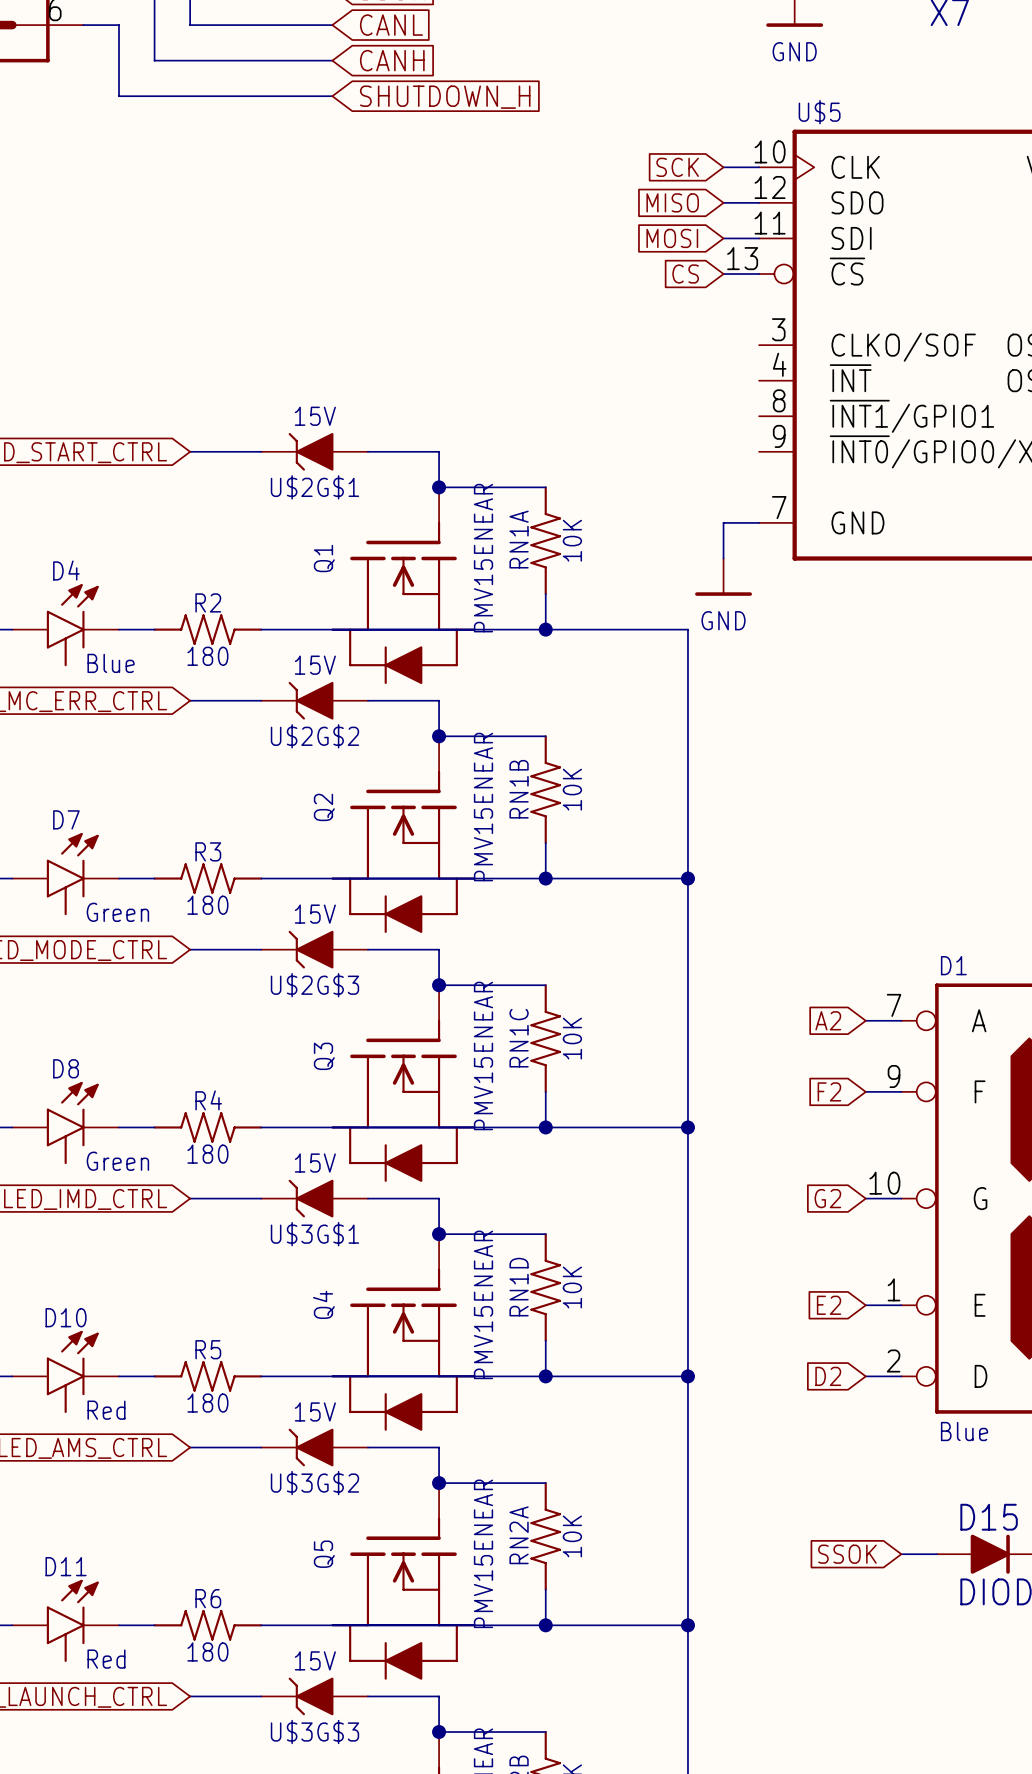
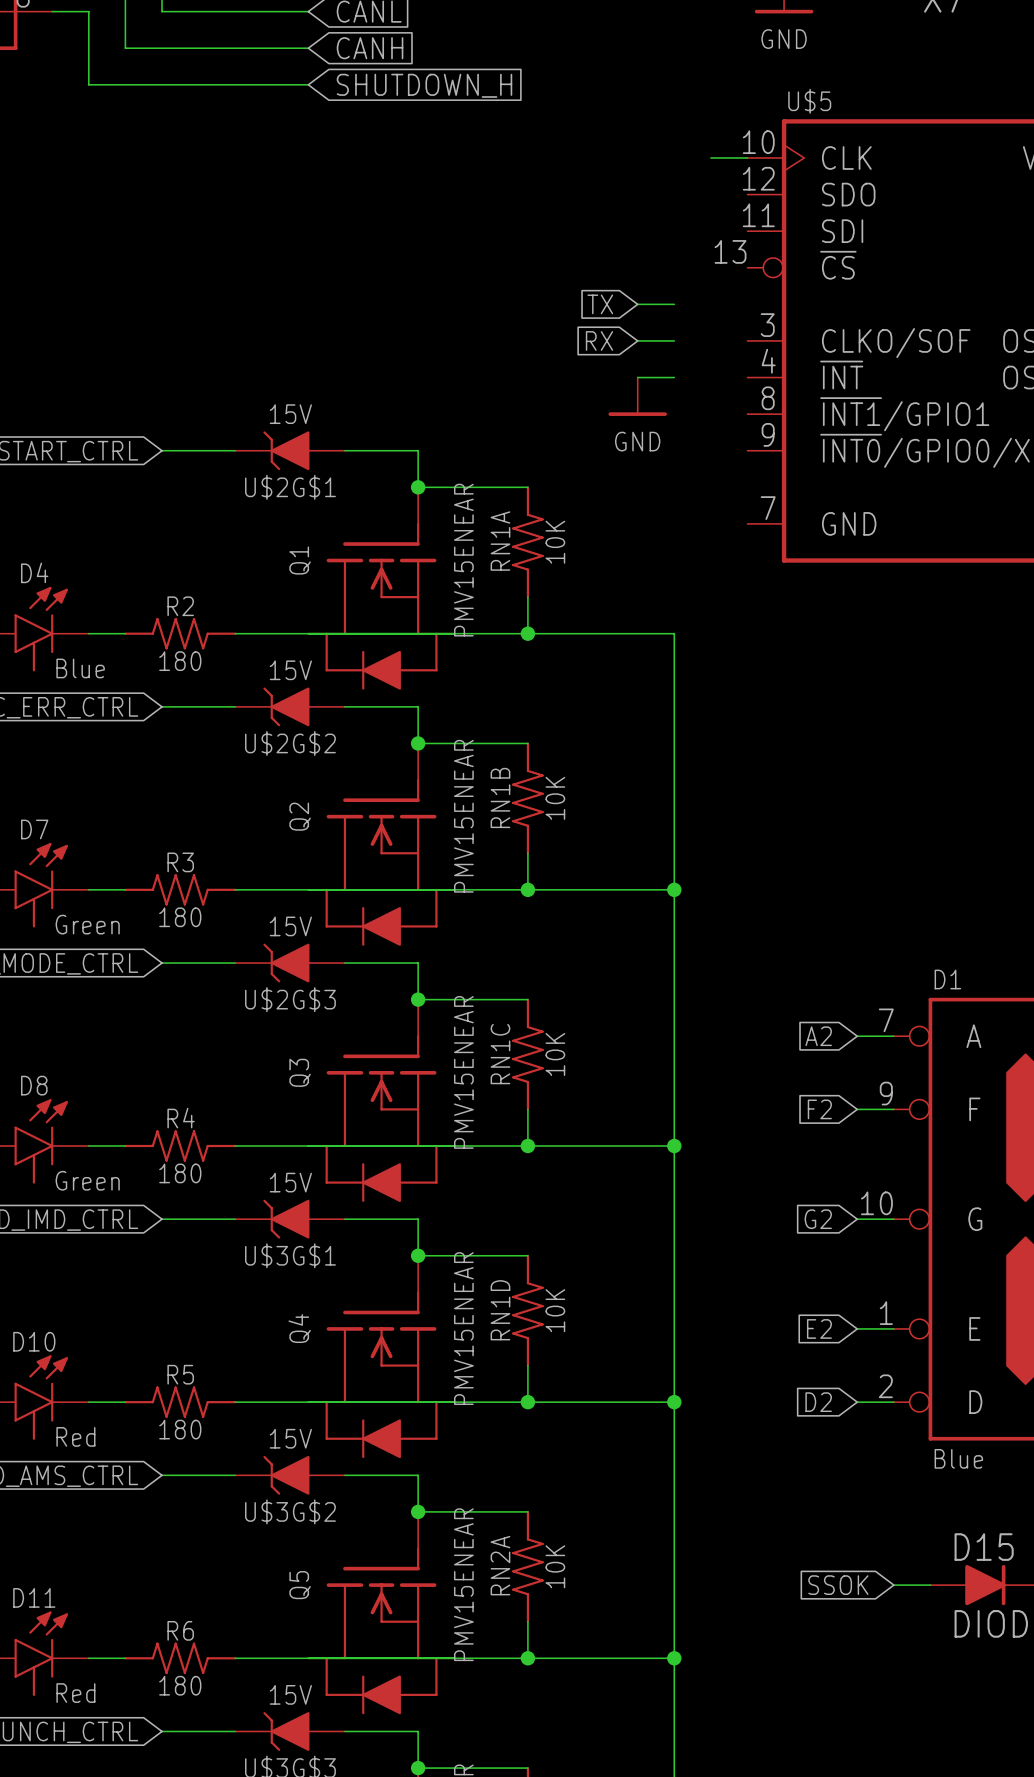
global label: SCK (677, 167) -> none
global label: MISO (672, 202) -> none
wire: (723, 202) (759, 202) -> (637, 304) (674, 304)
global label: MOSI (672, 238) -> none
wire: (723, 238) (759, 238) -> (637, 340) (674, 340)
global label: CS (685, 274) -> none
wire: (723, 274) (759, 274) -> (637, 377) (674, 377)
global label: none -> TX (600, 304)
global label: none -> RX (599, 340)
wire: (759, 522) (723, 522) (723, 558) -> none
power symbol position: GND (723, 577) -> GND (637, 396)

